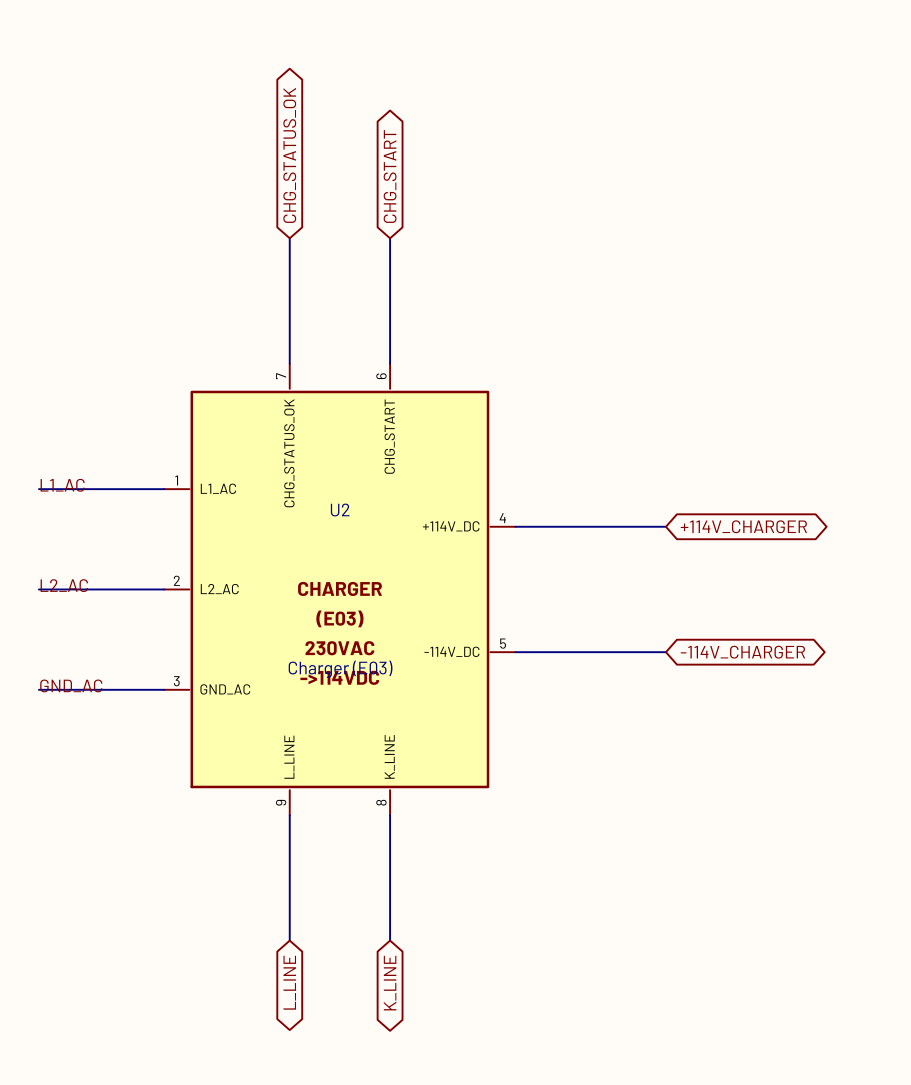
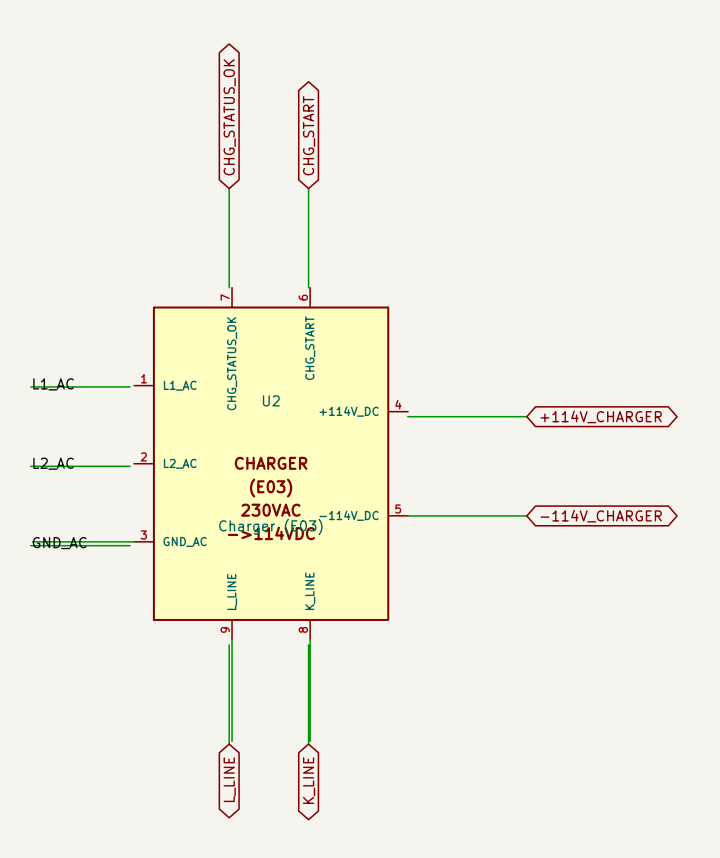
U2 symbol: [164, 363, 516, 816] -> [134, 287, 409, 640]
wire: none -> (32, 541) (134, 541)
wire: none -> (232, 639) (232, 741)
wire: none -> (310, 639) (310, 741)

